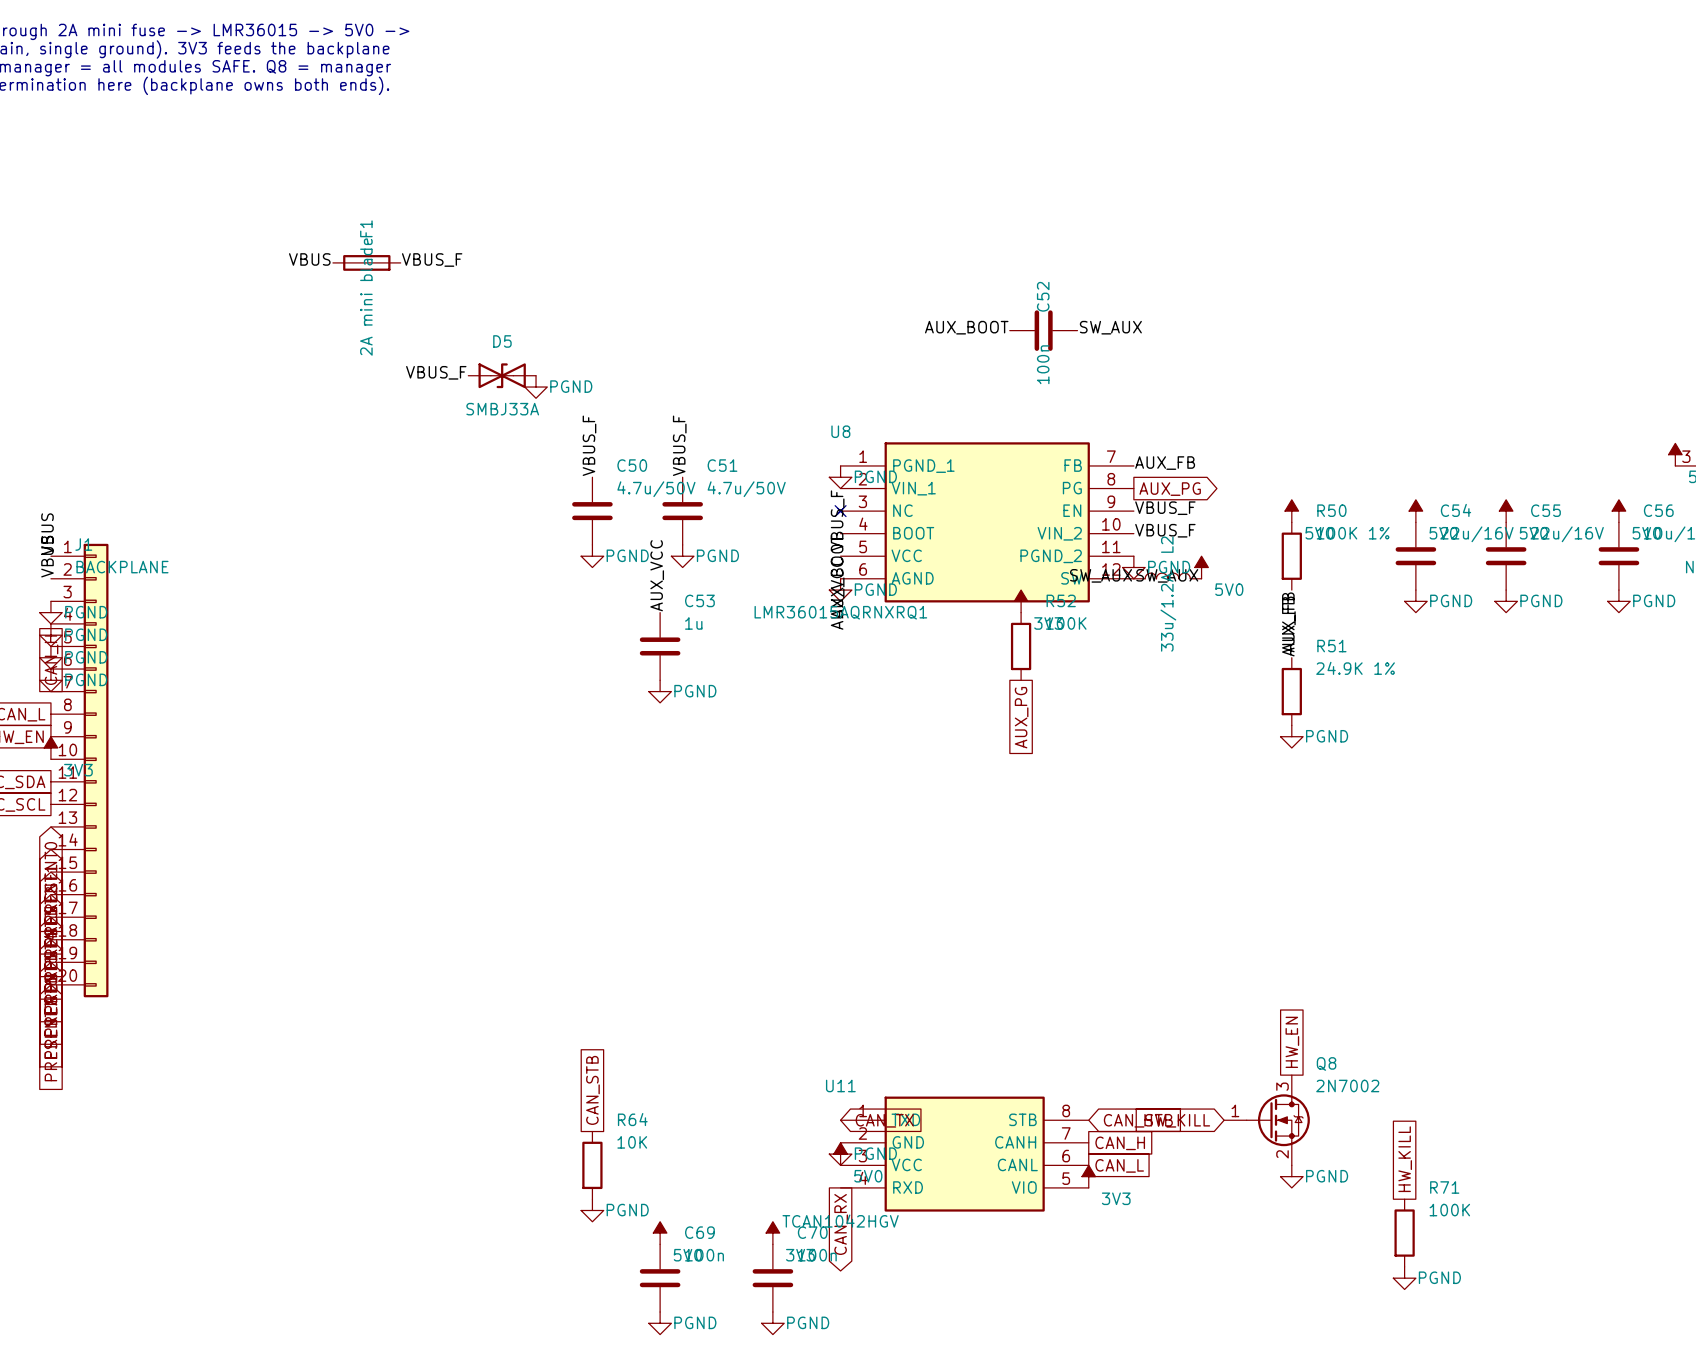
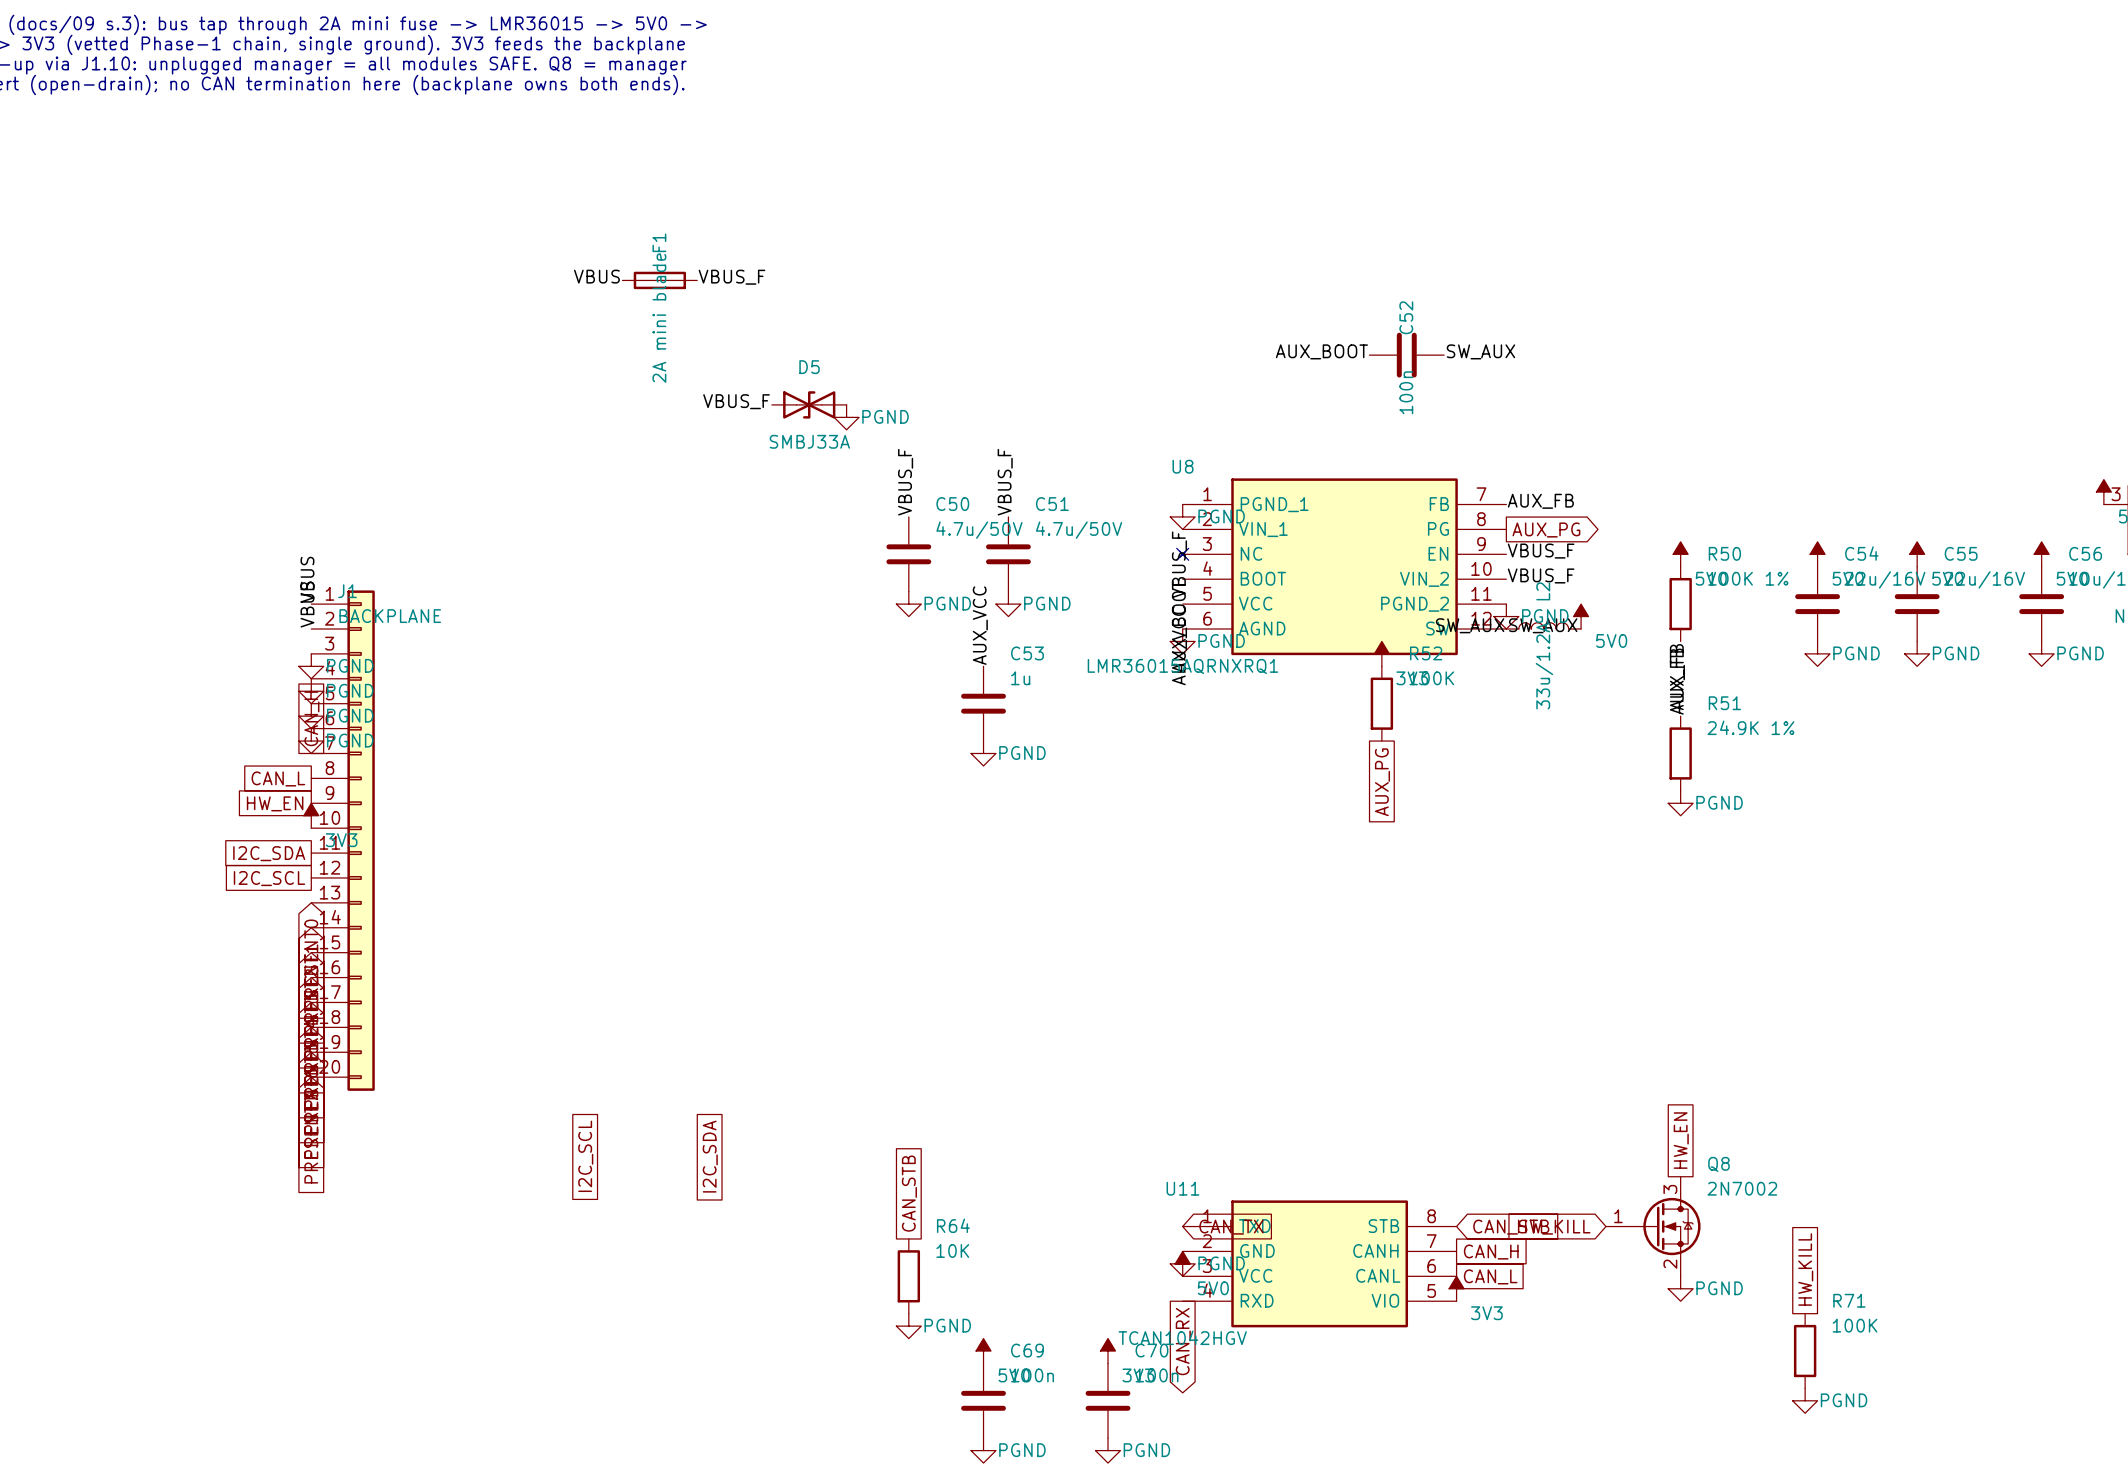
global label: none -> I2C_SCL (585, 1156)
global label: none -> I2C_SDA (710, 1156)

